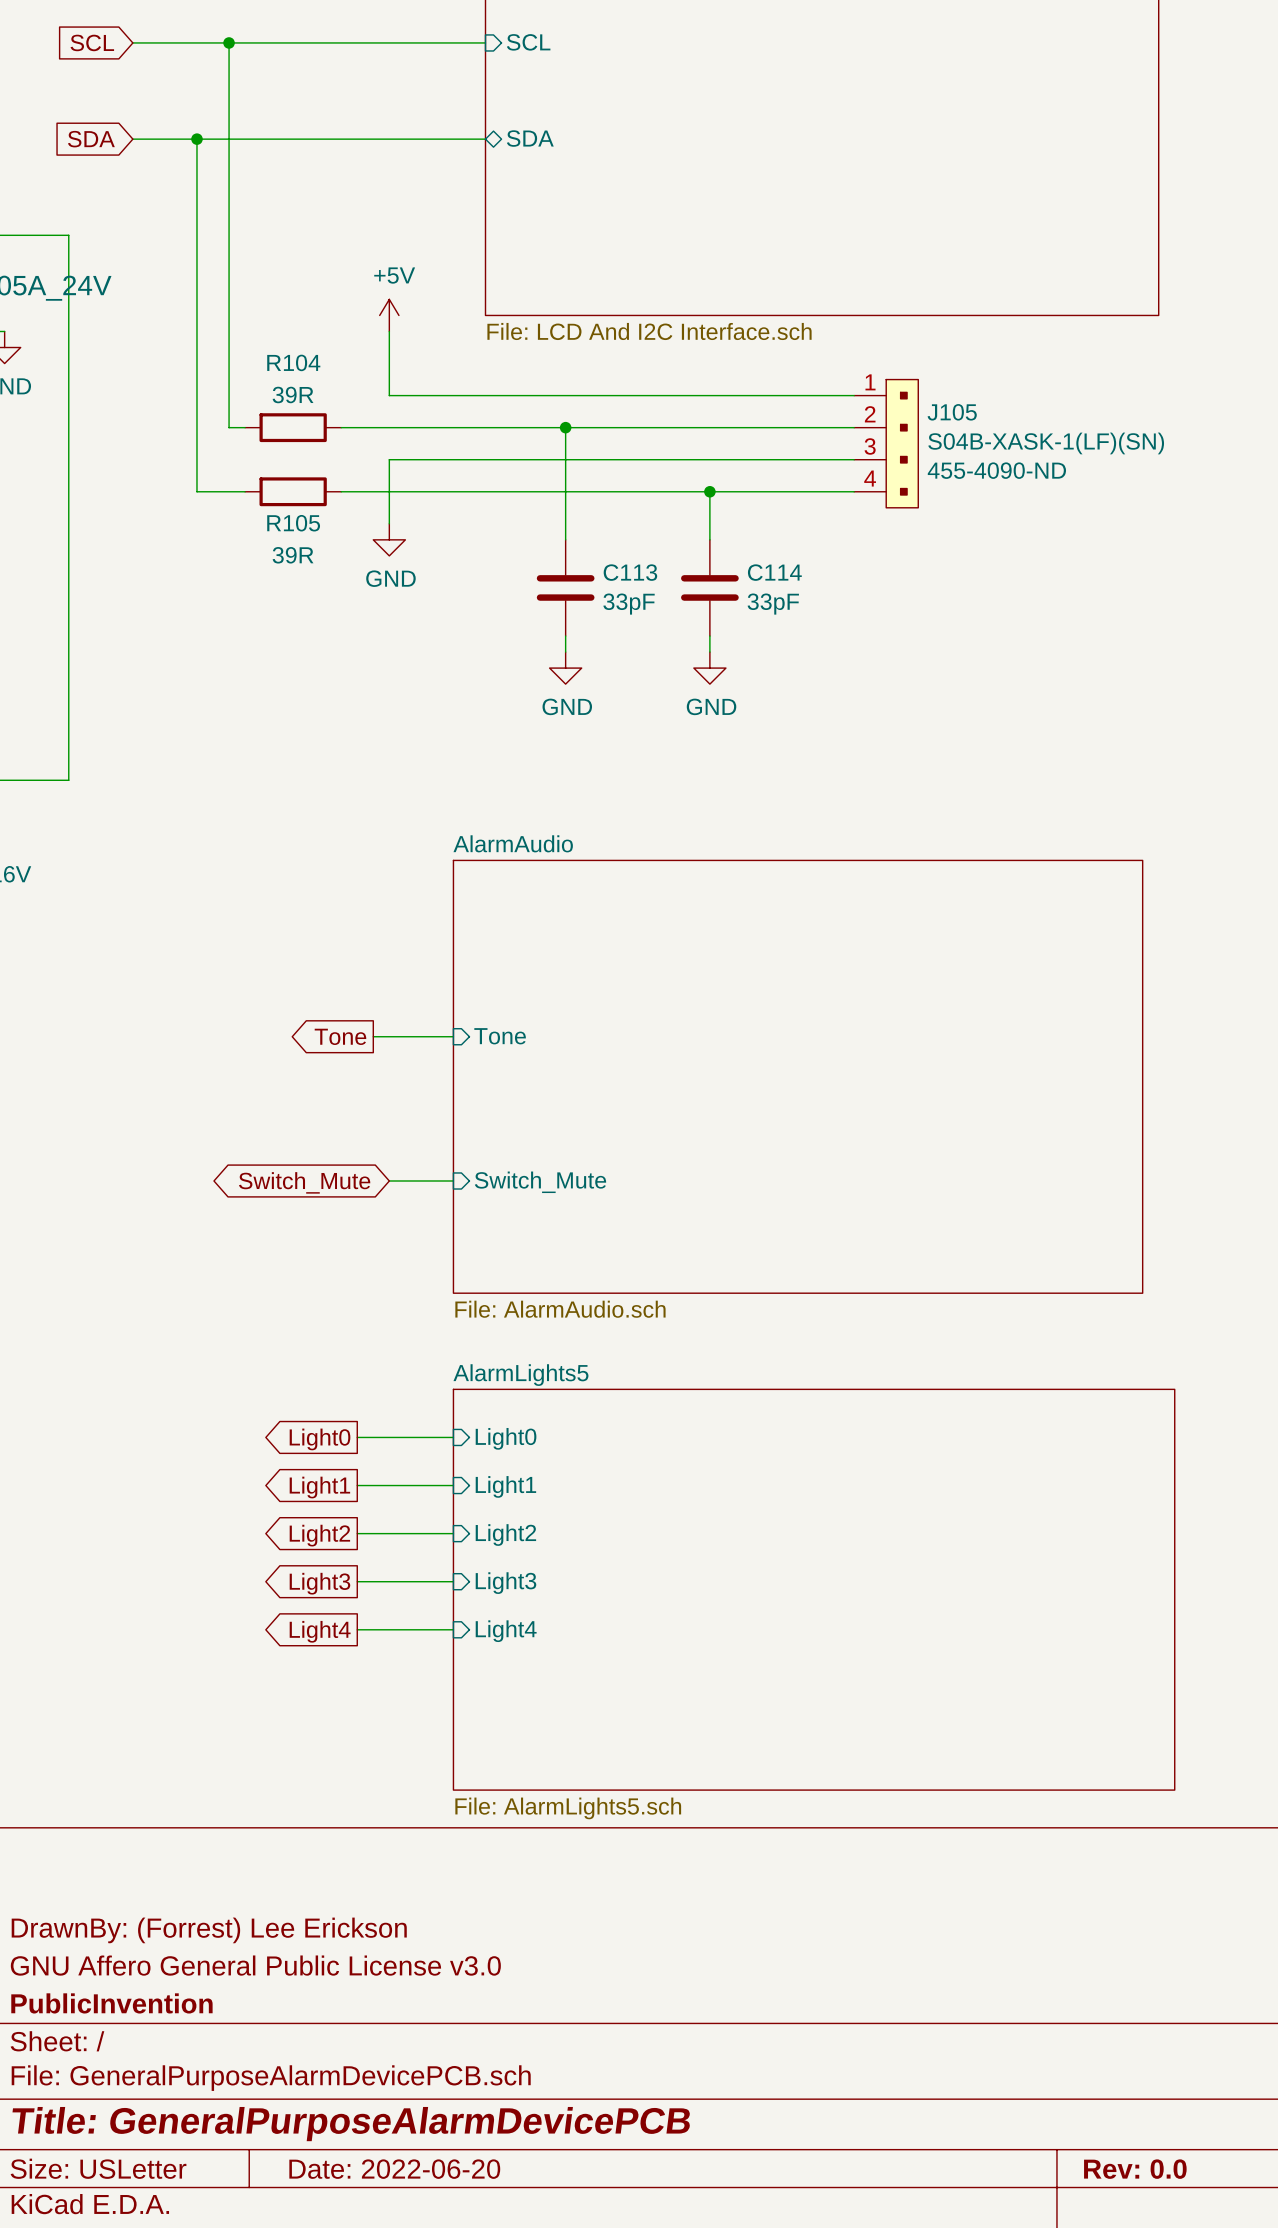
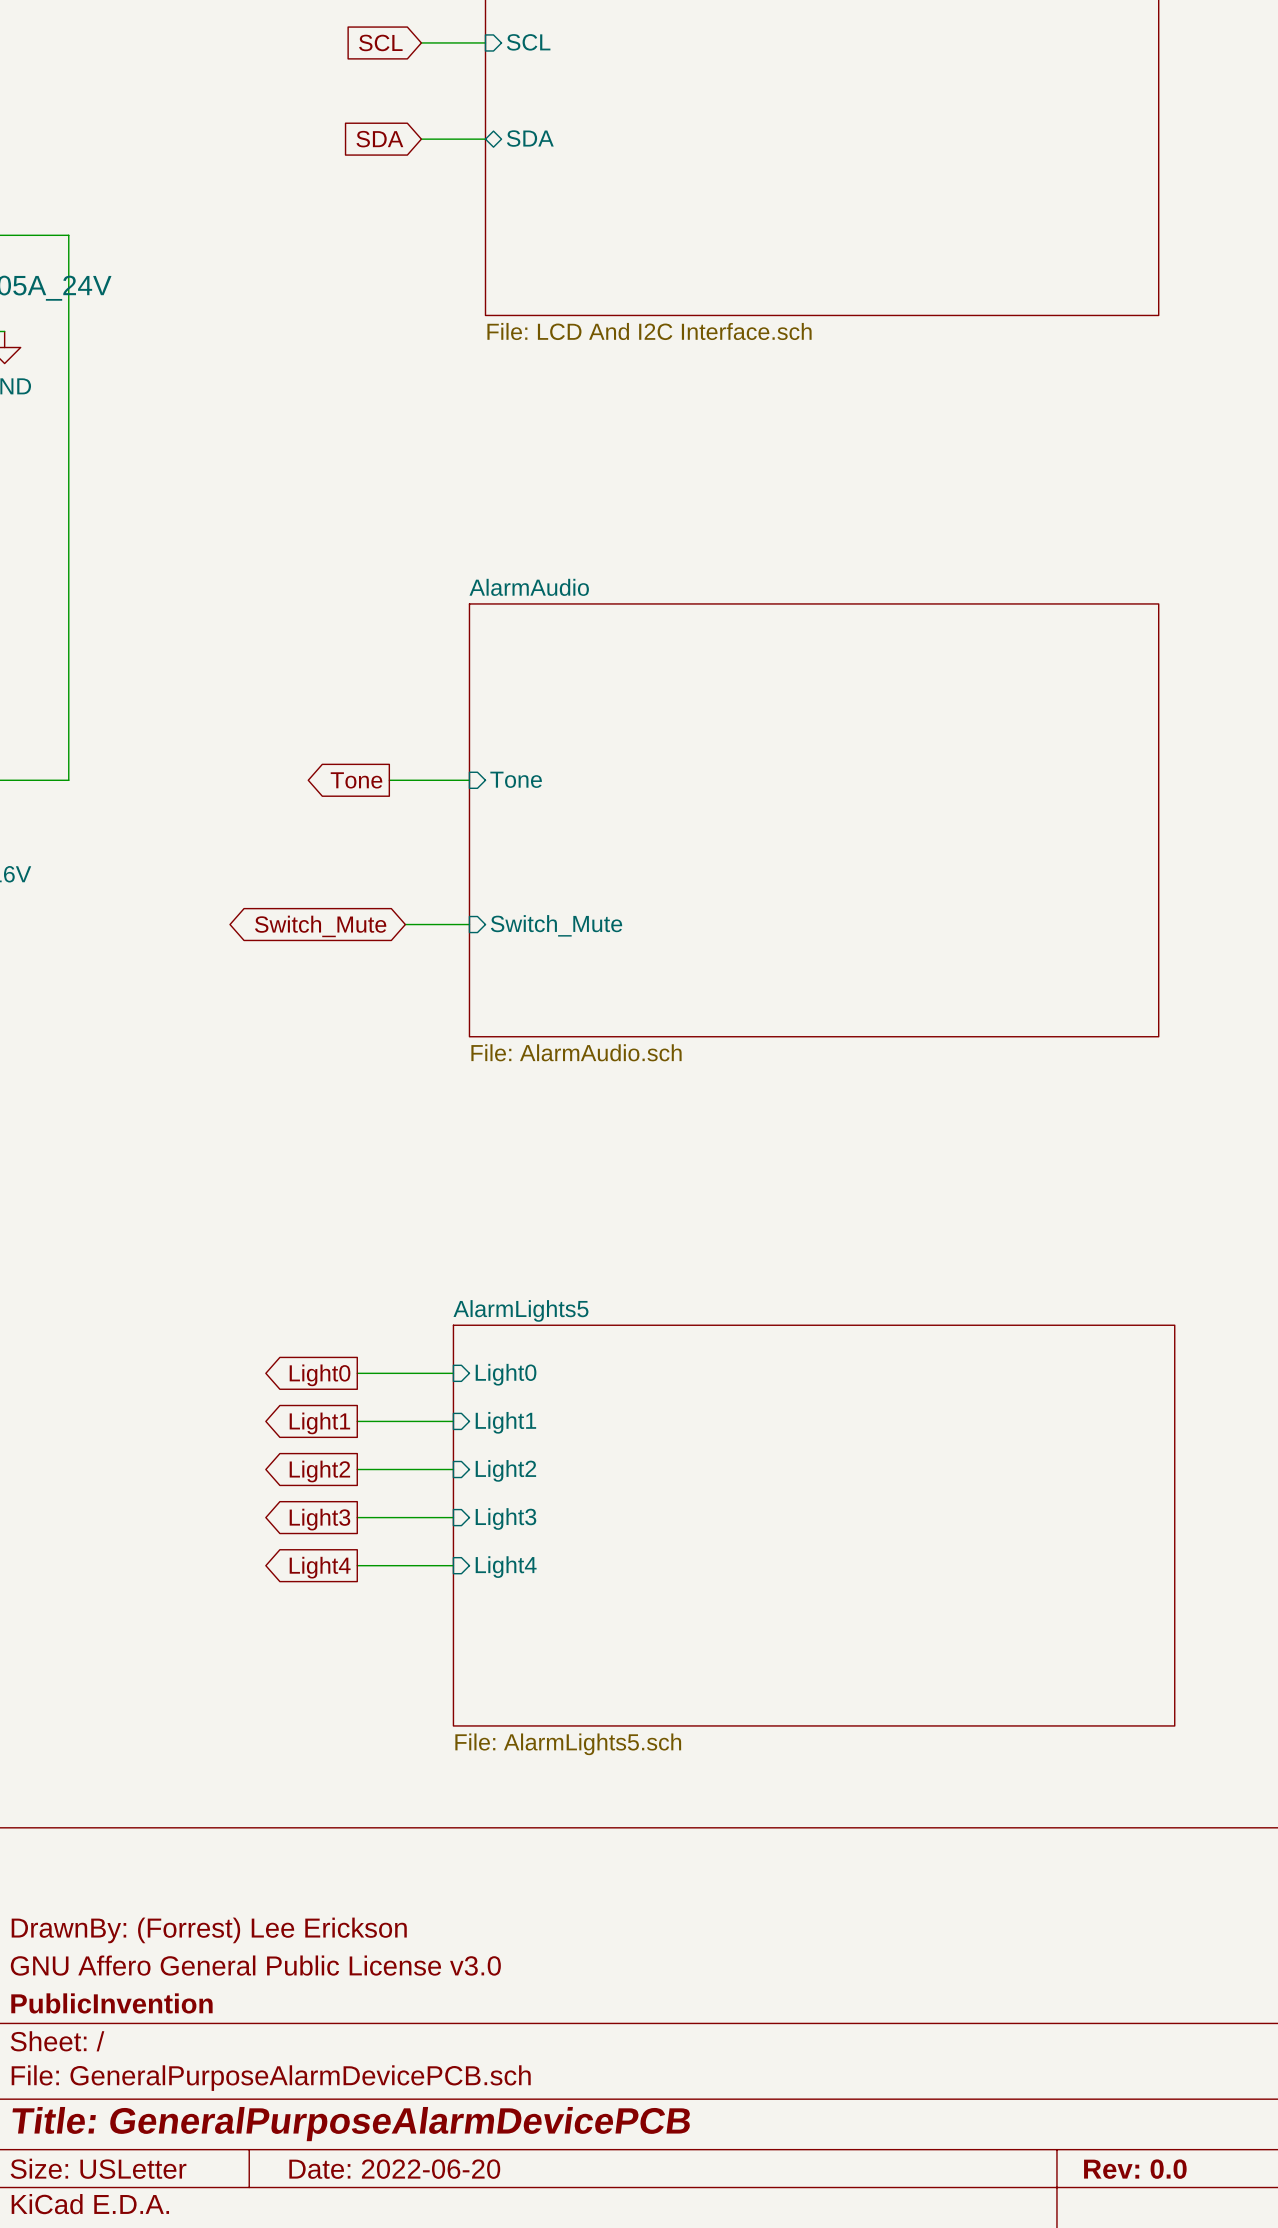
global label position: SCL (92, 42) -> SCL (380, 42)
wire: (132, 42) (421, 42) -> none
wire: (229, 42) (229, 427) (245, 427) -> none
junction: (229, 42) -> none
global label position: SDA (91, 139) -> SDA (379, 139)
wire: (132, 139) (421, 139) -> none
wire: (196, 139) (196, 491) (245, 491) -> none
junction: (196, 139) -> none
power symbol: +5V (389, 315) -> none
wire: (389, 331) (389, 395) (854, 395) -> none
R104: 39R (293, 427) -> none
wire: (341, 427) (854, 427) -> none
wire: (565, 427) (565, 539) -> none
junction: (565, 427) -> none
J105: S04B-XASK-1(LF)(SN) (886, 443) -> none
wire: (854, 459) (389, 459) (389, 523) -> none
R105: 39R (293, 491) -> none
wire: (341, 491) (854, 491) -> none
wire: (709, 491) (709, 539) -> none
junction: (709, 491) -> none
power symbol: GND (389, 539) -> none
C113: 33pF (565, 587) -> none
C114: 33pF (709, 587) -> none
wire: (565, 636) (565, 652) -> none
wire: (709, 636) (709, 652) -> none
power symbol: GND (565, 668) -> none
power symbol: GND (709, 668) -> none
global label position: Tone (340, 1036) -> Tone (356, 780)
wire: (373, 1036) (453, 1036) -> (389, 780) (469, 780)
sheet pin position: Tone (500, 1036) -> Tone (516, 779)
sheet AlarmAudio position: (798, 1076) -> (814, 820)
wire: (389, 1180) (453, 1180) -> (405, 924) (469, 924)
global label position: Switch_Mute (304, 1182) -> Switch_Mute (320, 926)
sheet pin position: Switch_Mute (540, 1182) -> Switch_Mute (556, 925)
wire: (357, 1437) (453, 1437) -> (357, 1373) (453, 1373)
sheet pin position: Light0 (506, 1438) -> Light0 (506, 1374)
global label position: Light0 (320, 1439) -> Light0 (320, 1375)
wire: (357, 1485) (453, 1485) -> (357, 1421) (453, 1421)
sheet pin position: Light1 (505, 1486) -> Light1 (505, 1422)
global label position: Light1 (319, 1487) -> Light1 (319, 1423)
wire: (357, 1533) (453, 1533) -> (357, 1469) (453, 1469)
global label position: Light2 (319, 1535) -> Light2 (319, 1471)
sheet pin position: Light2 (505, 1535) -> Light2 (505, 1470)
wire: (357, 1581) (453, 1581) -> (357, 1517) (453, 1517)
global label position: Light3 (319, 1583) -> Light3 (319, 1519)
sheet pin position: Light3 (505, 1583) -> Light3 (505, 1518)
sheet AlarmLights5 position: (814, 1589) -> (814, 1525)
wire: (357, 1629) (453, 1629) -> (357, 1565) (453, 1565)
global label position: Light4 (320, 1631) -> Light4 (320, 1567)
sheet pin position: Light4 (506, 1631) -> Light4 (506, 1567)

